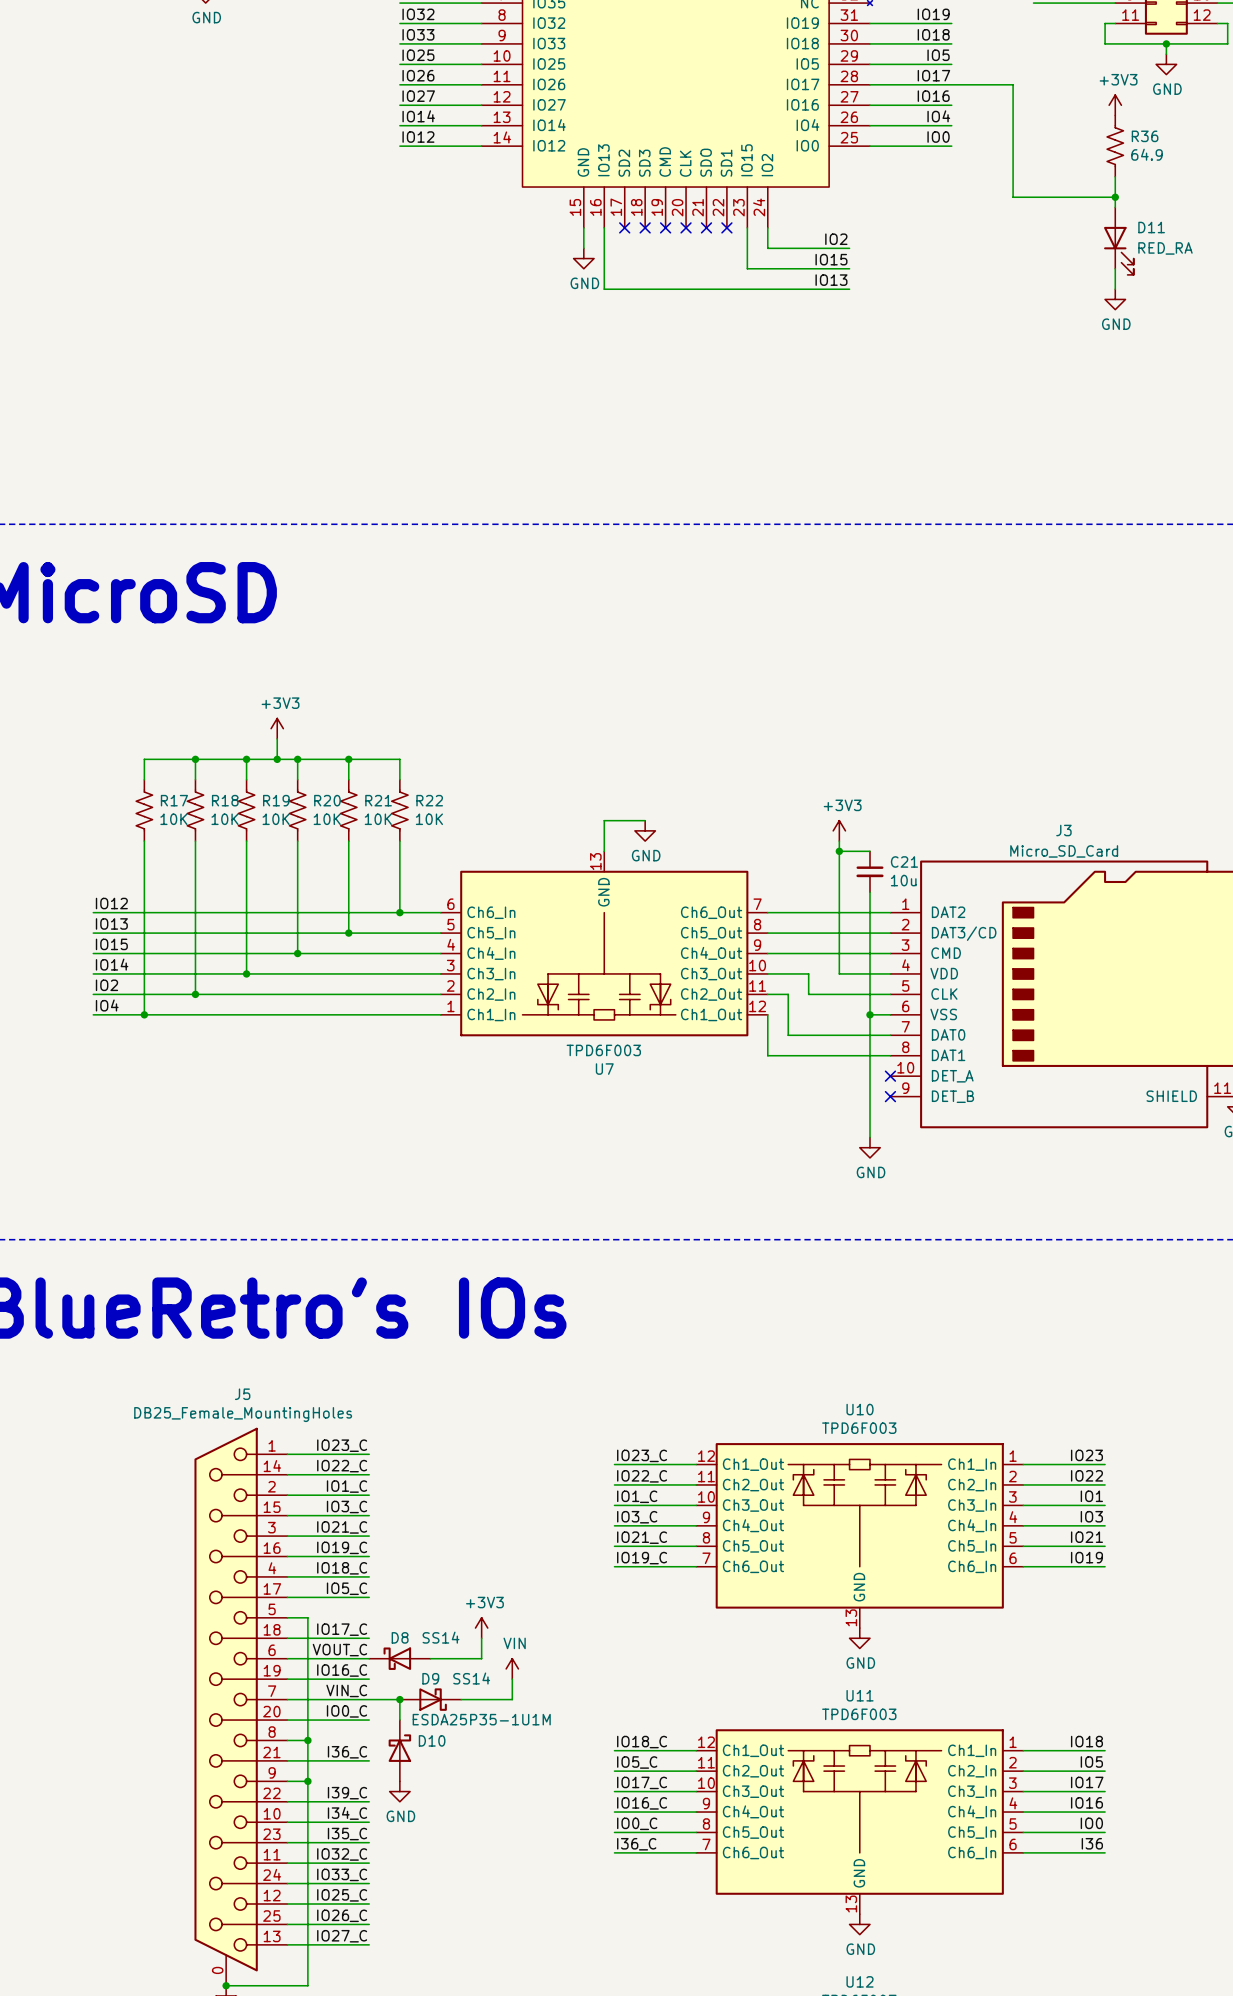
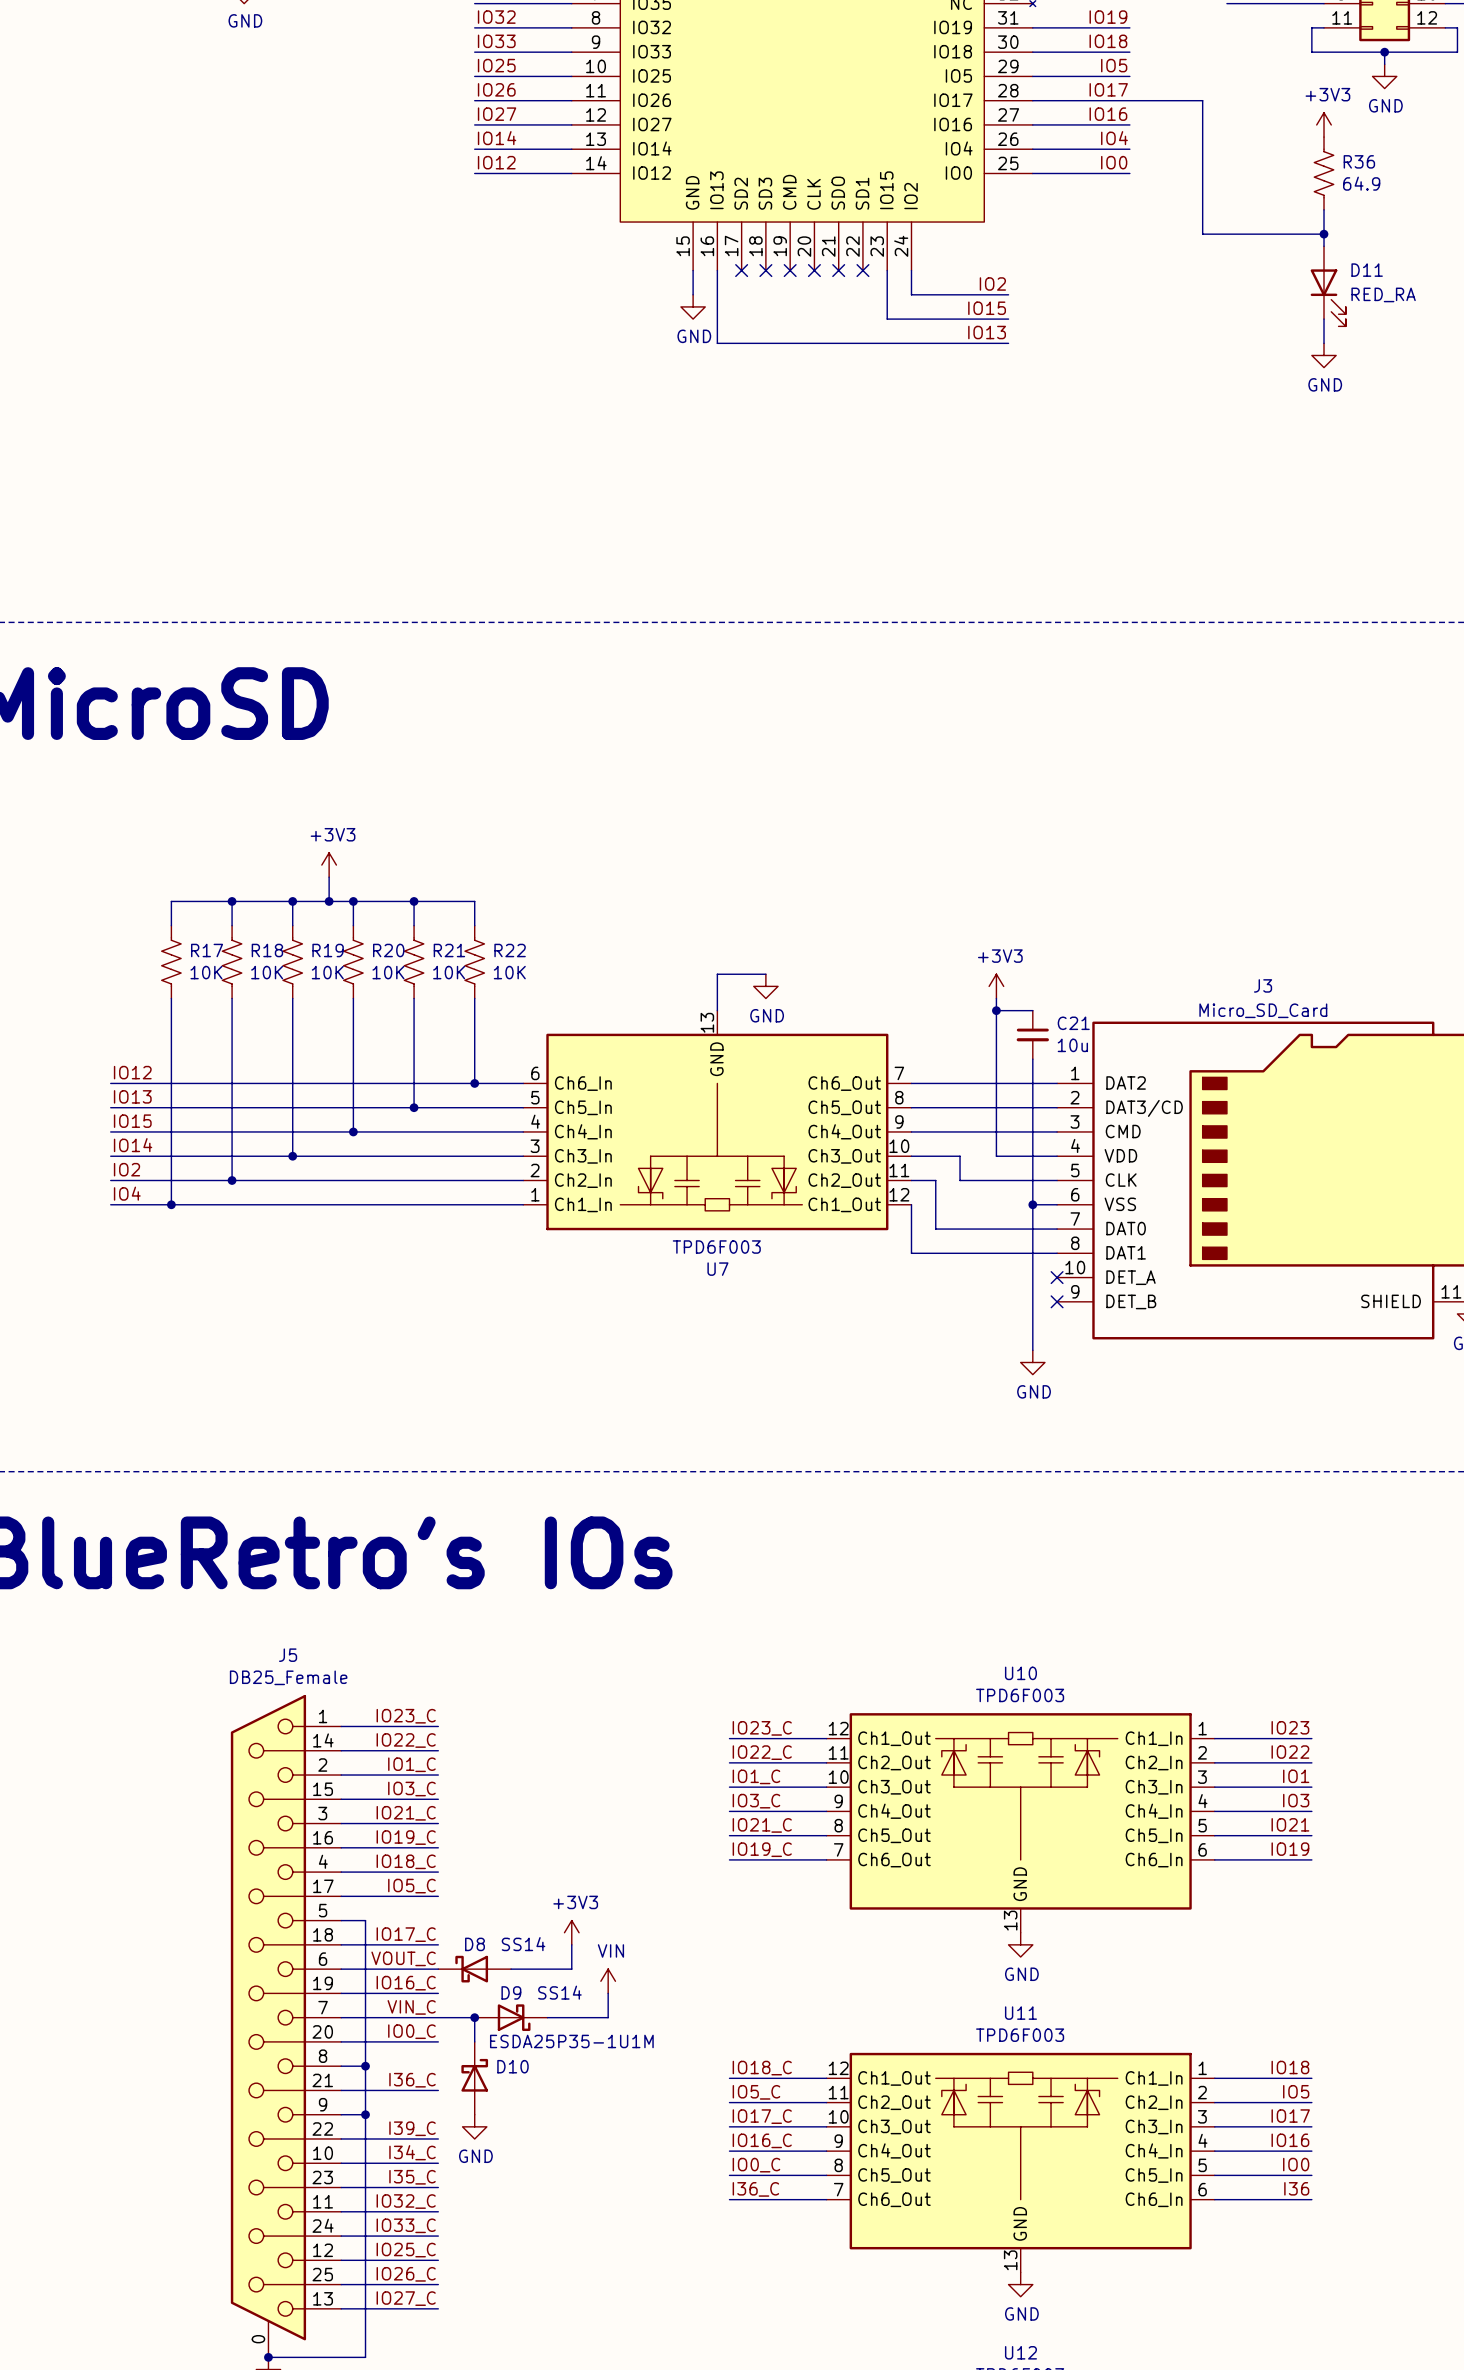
J5 value: DB25_Female_MountingHoles (243, 1414) -> DB25_Female (288, 1677)

